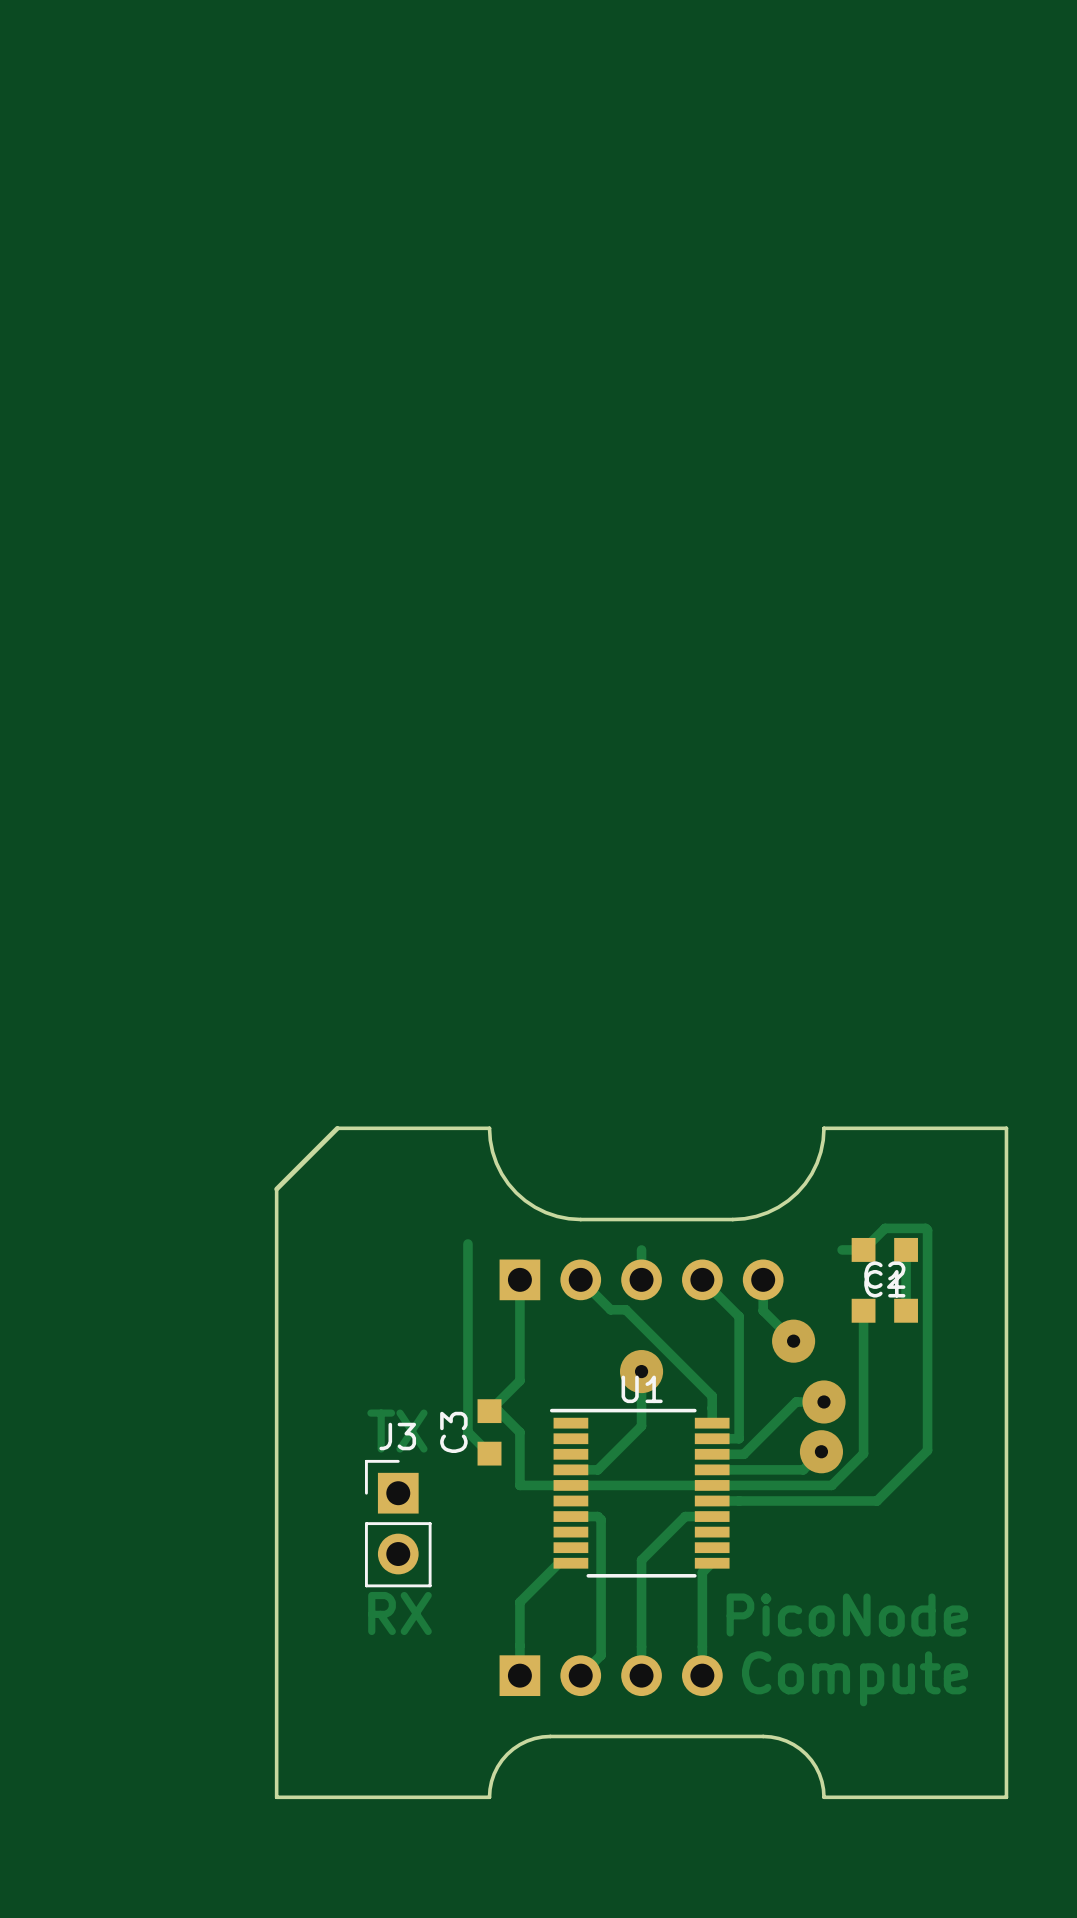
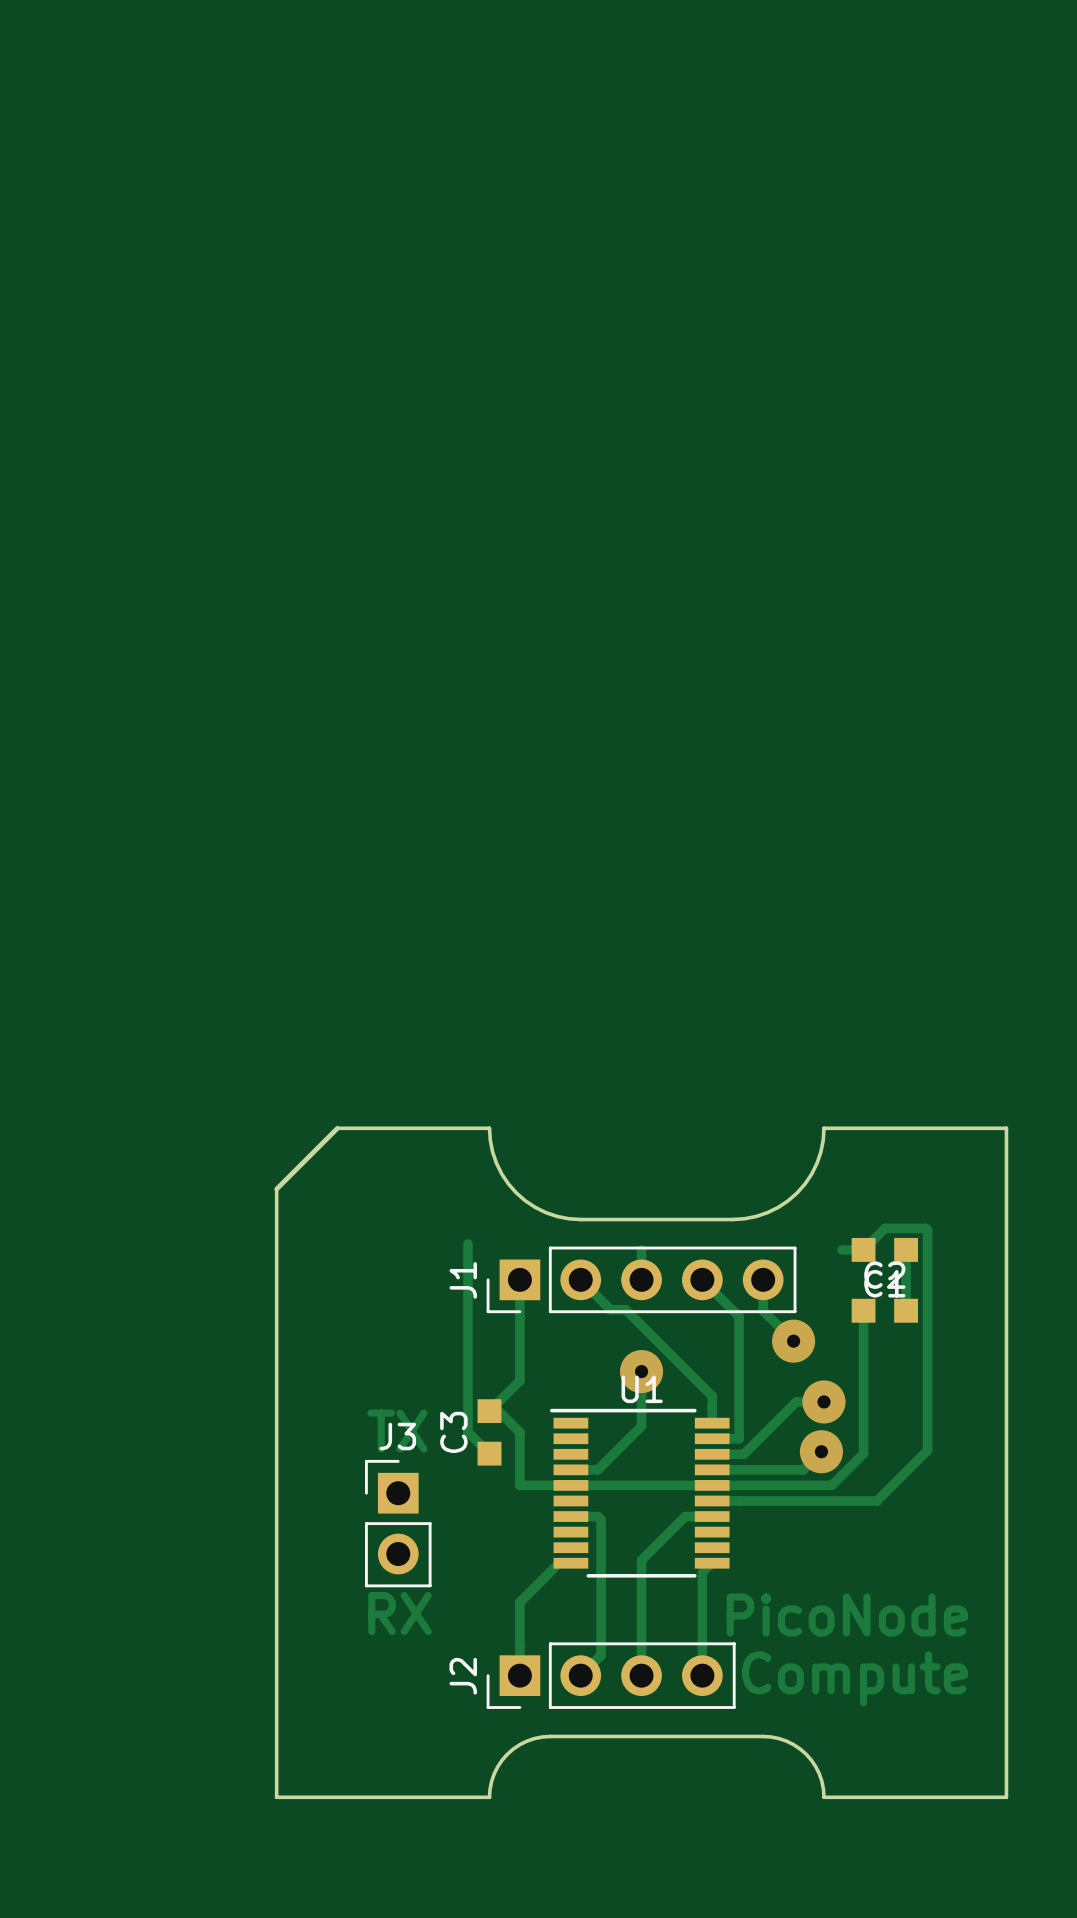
J1 side: bottom (641, 1279) -> top (641, 1279)
J2 side: bottom (611, 1675) -> top (611, 1675)

